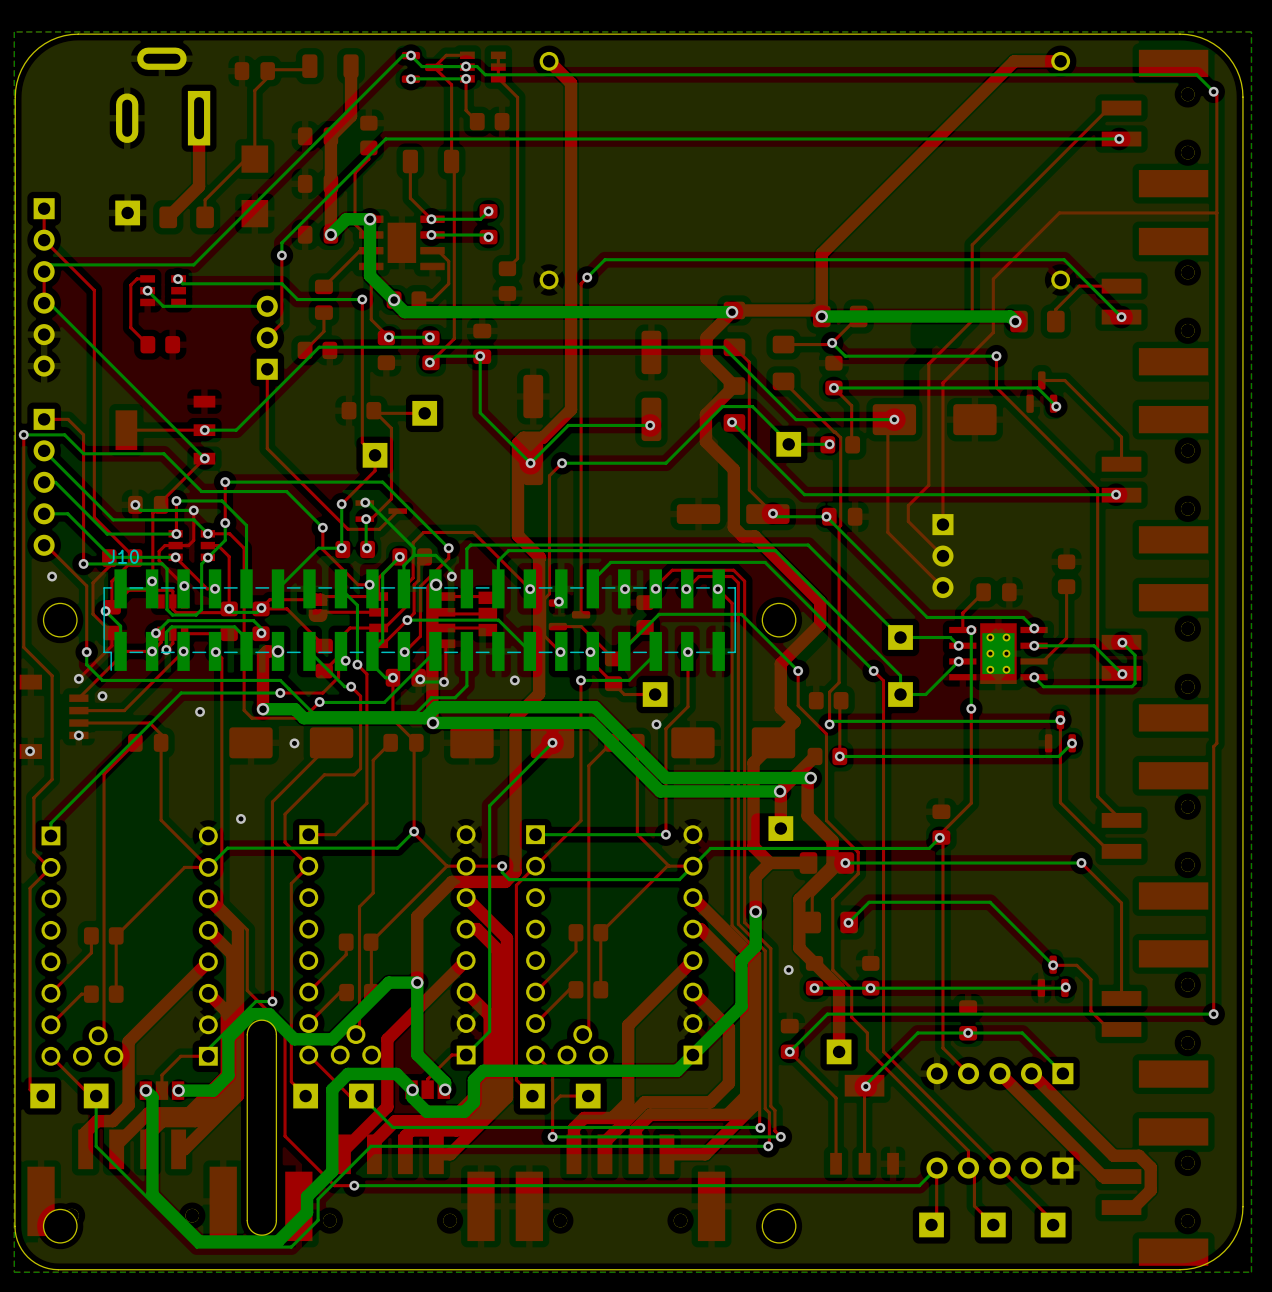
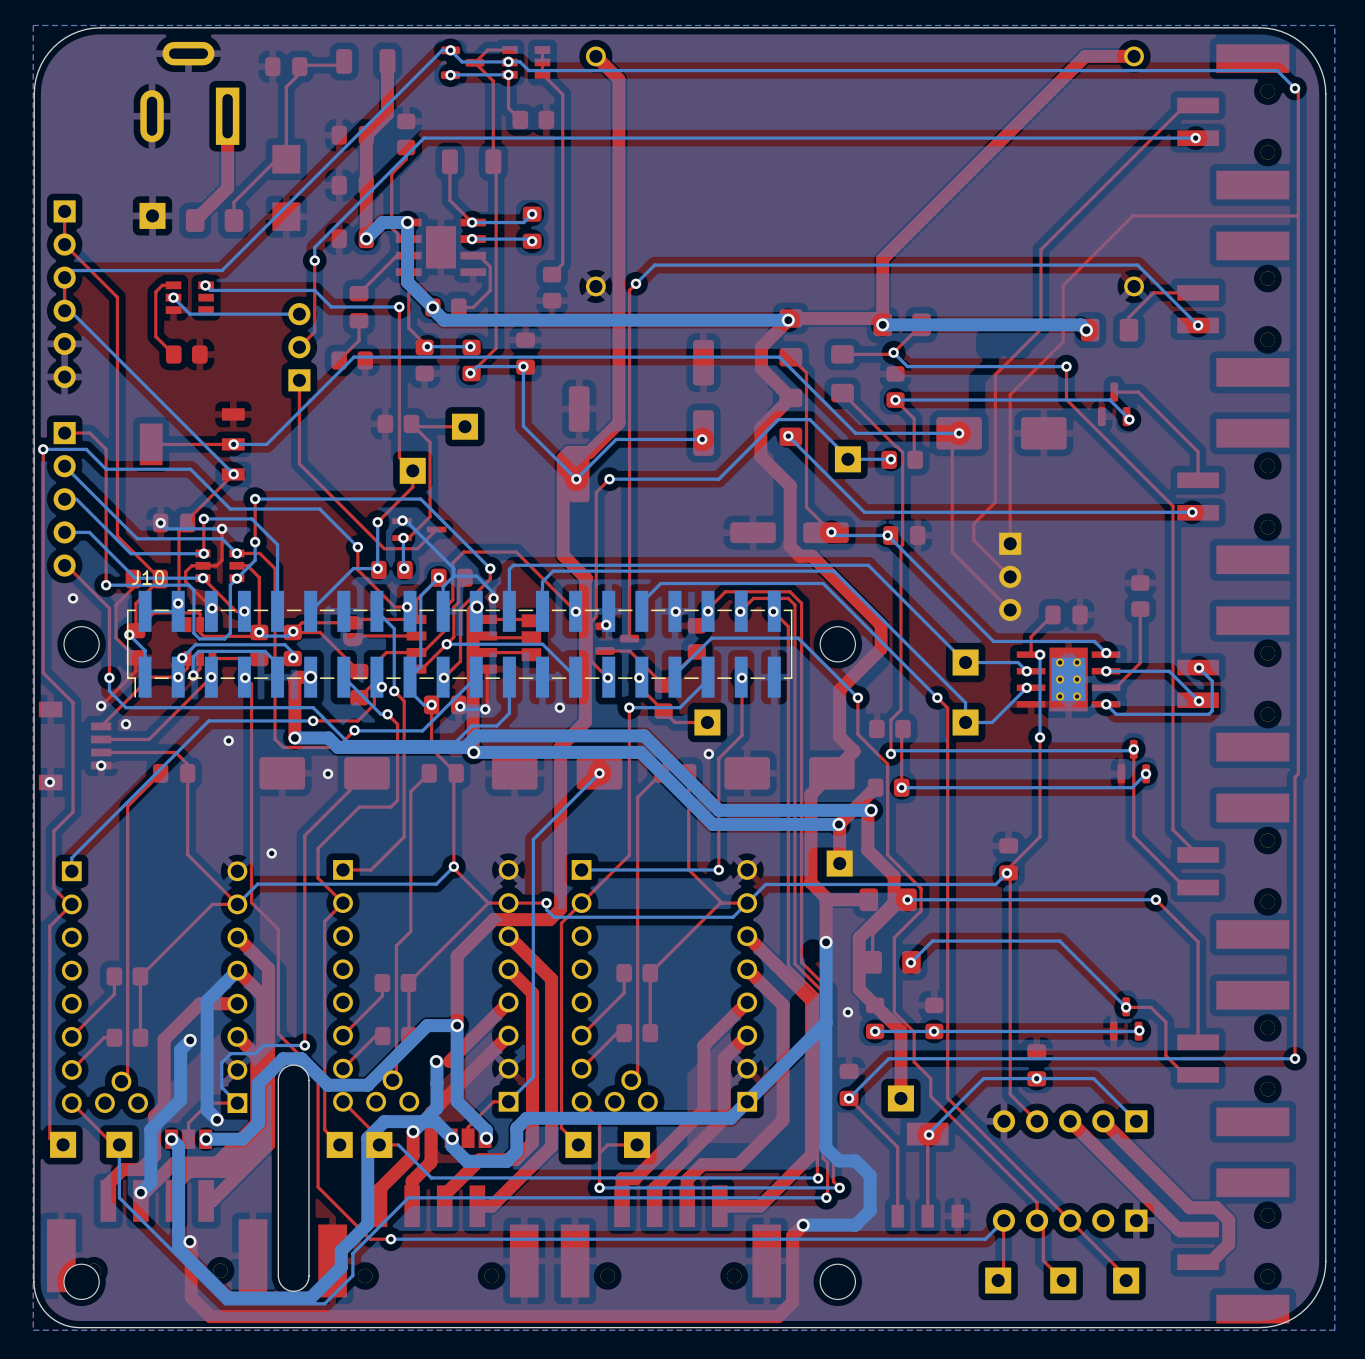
top track: (767, 864) (755, 877) (755, 911) -> (826, 901) (826, 942)
top track: (221, 865) (221, 904) (247, 929) -> (251, 902) (278, 929) (278, 970)
bottom track: (755, 911) (755, 946) (741, 960) (741, 1006) -> (826, 942) (826, 1022) (798, 1050)
via position: (755, 911) -> (826, 942)
top track: (466, 929) (477, 929) (497, 949) (497, 1089) (456, 1130) (411, 1130) (405, 1136) (405, 1142) -> (508, 969) (532, 993) (532, 1142) (515, 1159) (480, 1159) (444, 1194)
top track: (692, 929) (700, 929) (746, 974) (746, 1095) (727, 1114) (684, 1114) -> (747, 969) (783, 1005) (783, 1120) (738, 1164)
bottom track: none -> (237, 970) (207, 1000) (207, 1109) (217, 1119)
top track: (208, 961) (128, 1041) (128, 1105) (112, 1121) (96, 1121) (85, 1133) -> (237, 1003) (199, 1003) (164, 1039) (164, 1106) (154, 1116) (154, 1155) (140, 1169) (122, 1169) (108, 1184)
bottom track: none -> (825, 1023) (825, 1147) (839, 1160) (855, 1160) (870, 1175) (870, 1210) (855, 1225) (803, 1225)
top track: (466, 992) (489, 1015) (489, 1081) (450, 1121) (395, 1121) (374, 1141) -> (508, 1035) (431, 1113) (431, 1162) (412, 1181) (412, 1193)
top track: (692, 992) (728, 1028) (728, 1083) (710, 1102) (644, 1102) (604, 1141) -> (747, 1035) (724, 1058) (724, 1118) (654, 1188) (654, 1193)
bottom track: none -> (190, 1040) (180, 1049) (180, 1099) (150, 1129) (150, 1182) (140, 1192)
via: none -> (190, 1040)
bottom track: (255, 1001) (208, 1049) (208, 1056) -> (287, 1045) (263, 1045) (255, 1053) (230, 1053) (221, 1062) (221, 1087) (237, 1103)
top track: (651, 1001) (628, 1025) (628, 1102) (612, 1117) (584, 1117) (573, 1128) -> (703, 1045) (703, 1109) (635, 1178) (622, 1178)
bottom track: none -> (436, 1061) (436, 1107) (413, 1131)
via: none -> (436, 1061)
top track: (409, 1016) (387, 1039) (387, 1106) (343, 1150) -> (413, 1131) (413, 1155) (379, 1189) (379, 1202)
via: none -> (217, 1119)
via: none -> (413, 1131)
part position: (361, 1096) -> (379, 1144)
via: none -> (140, 1192)
top track: none -> (803, 1225) (792, 1235) (792, 1302) (778, 1316) (210, 1316) (191, 1297) (189, 1241)
via: none -> (803, 1225)
via: none -> (189, 1241)

